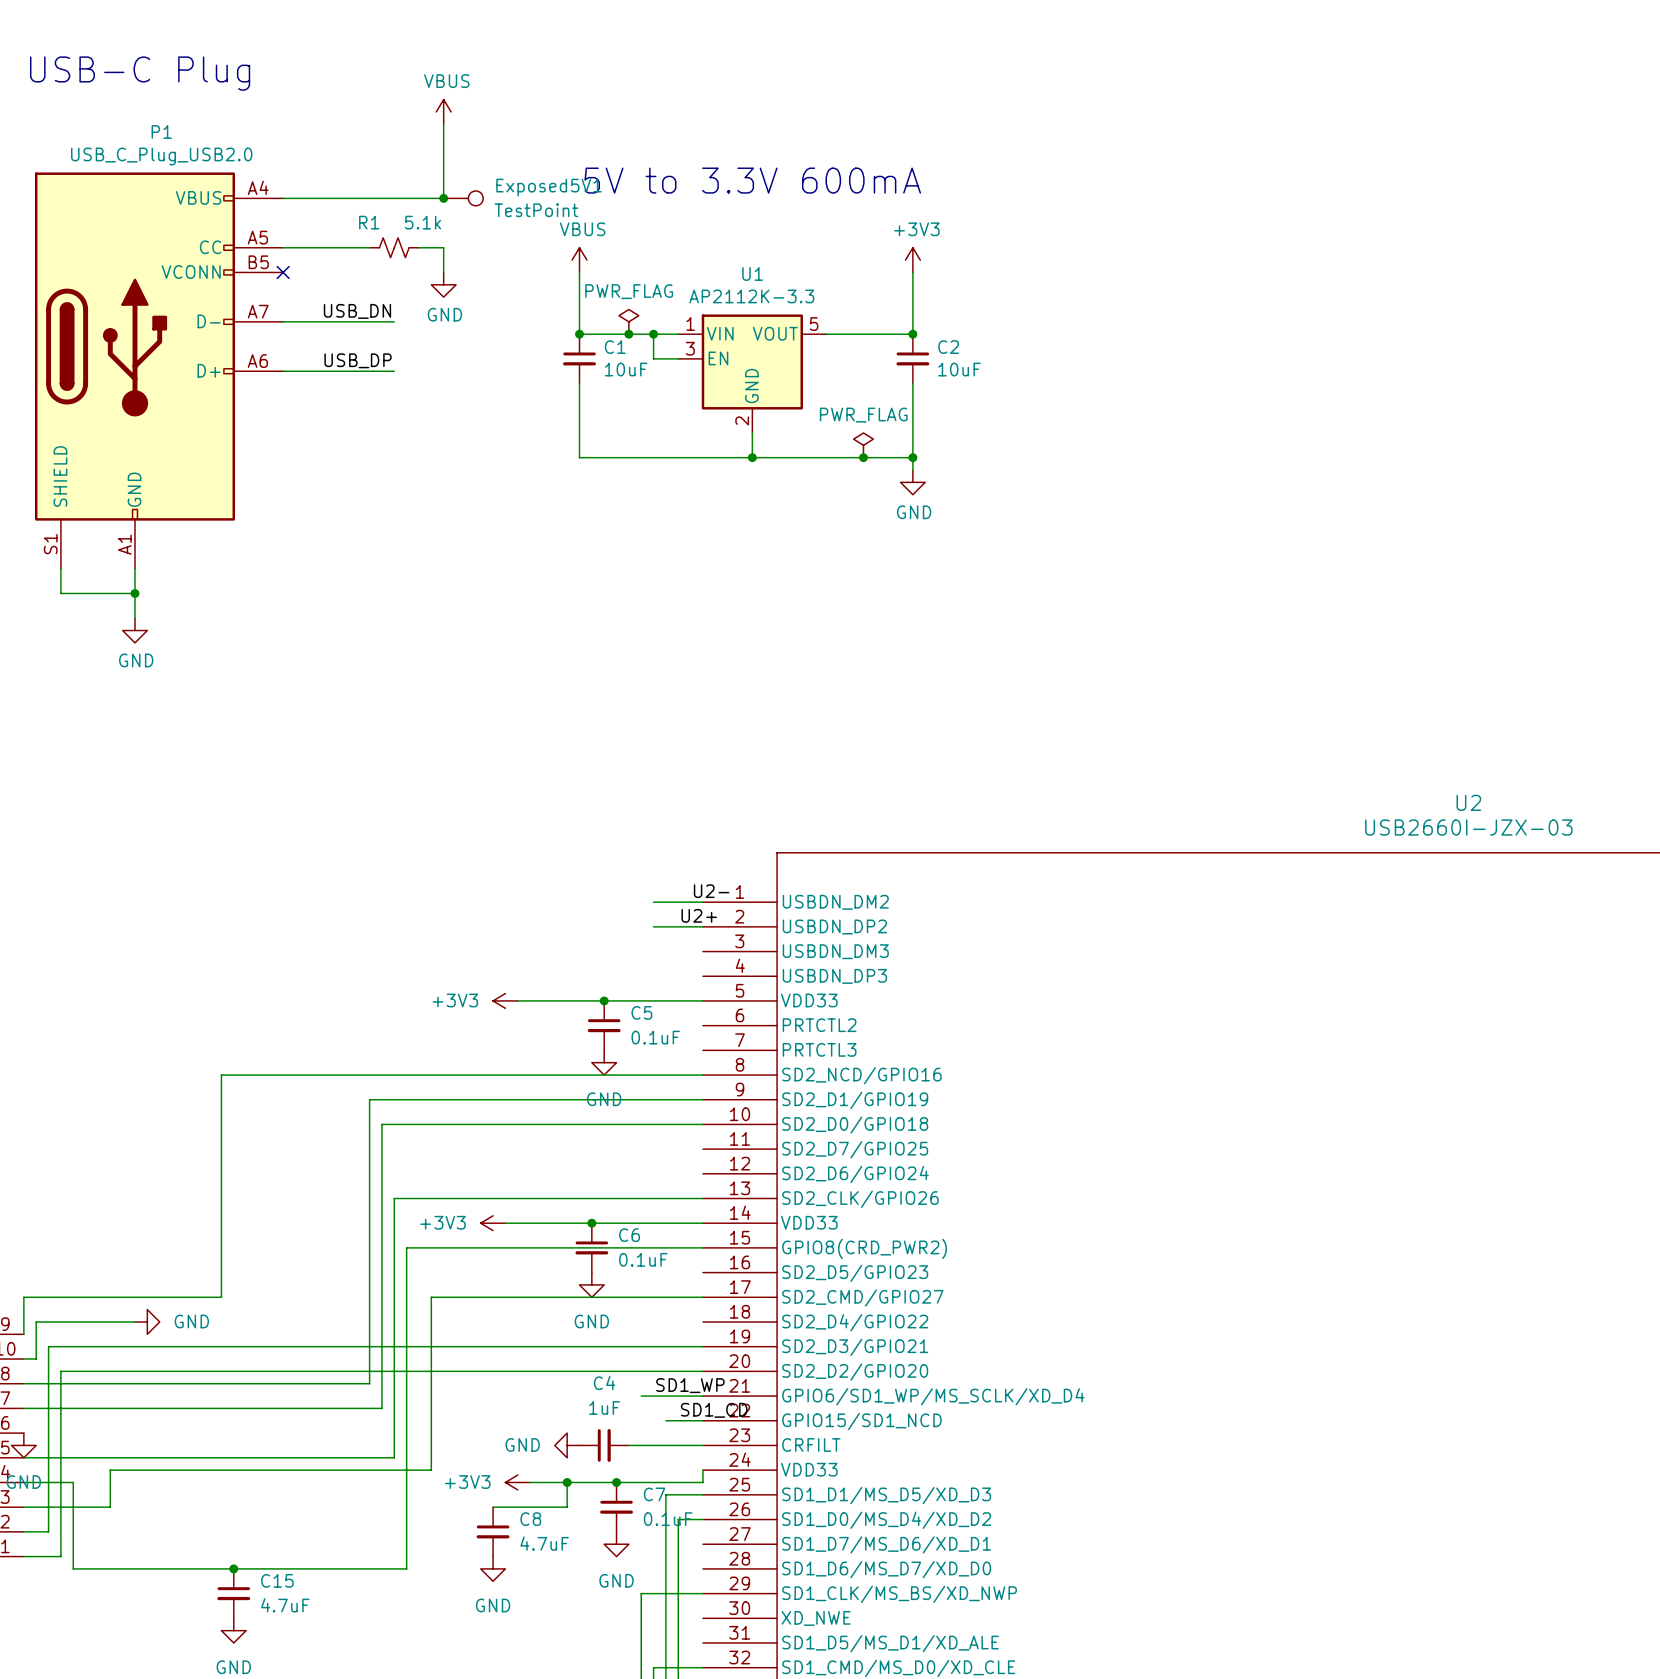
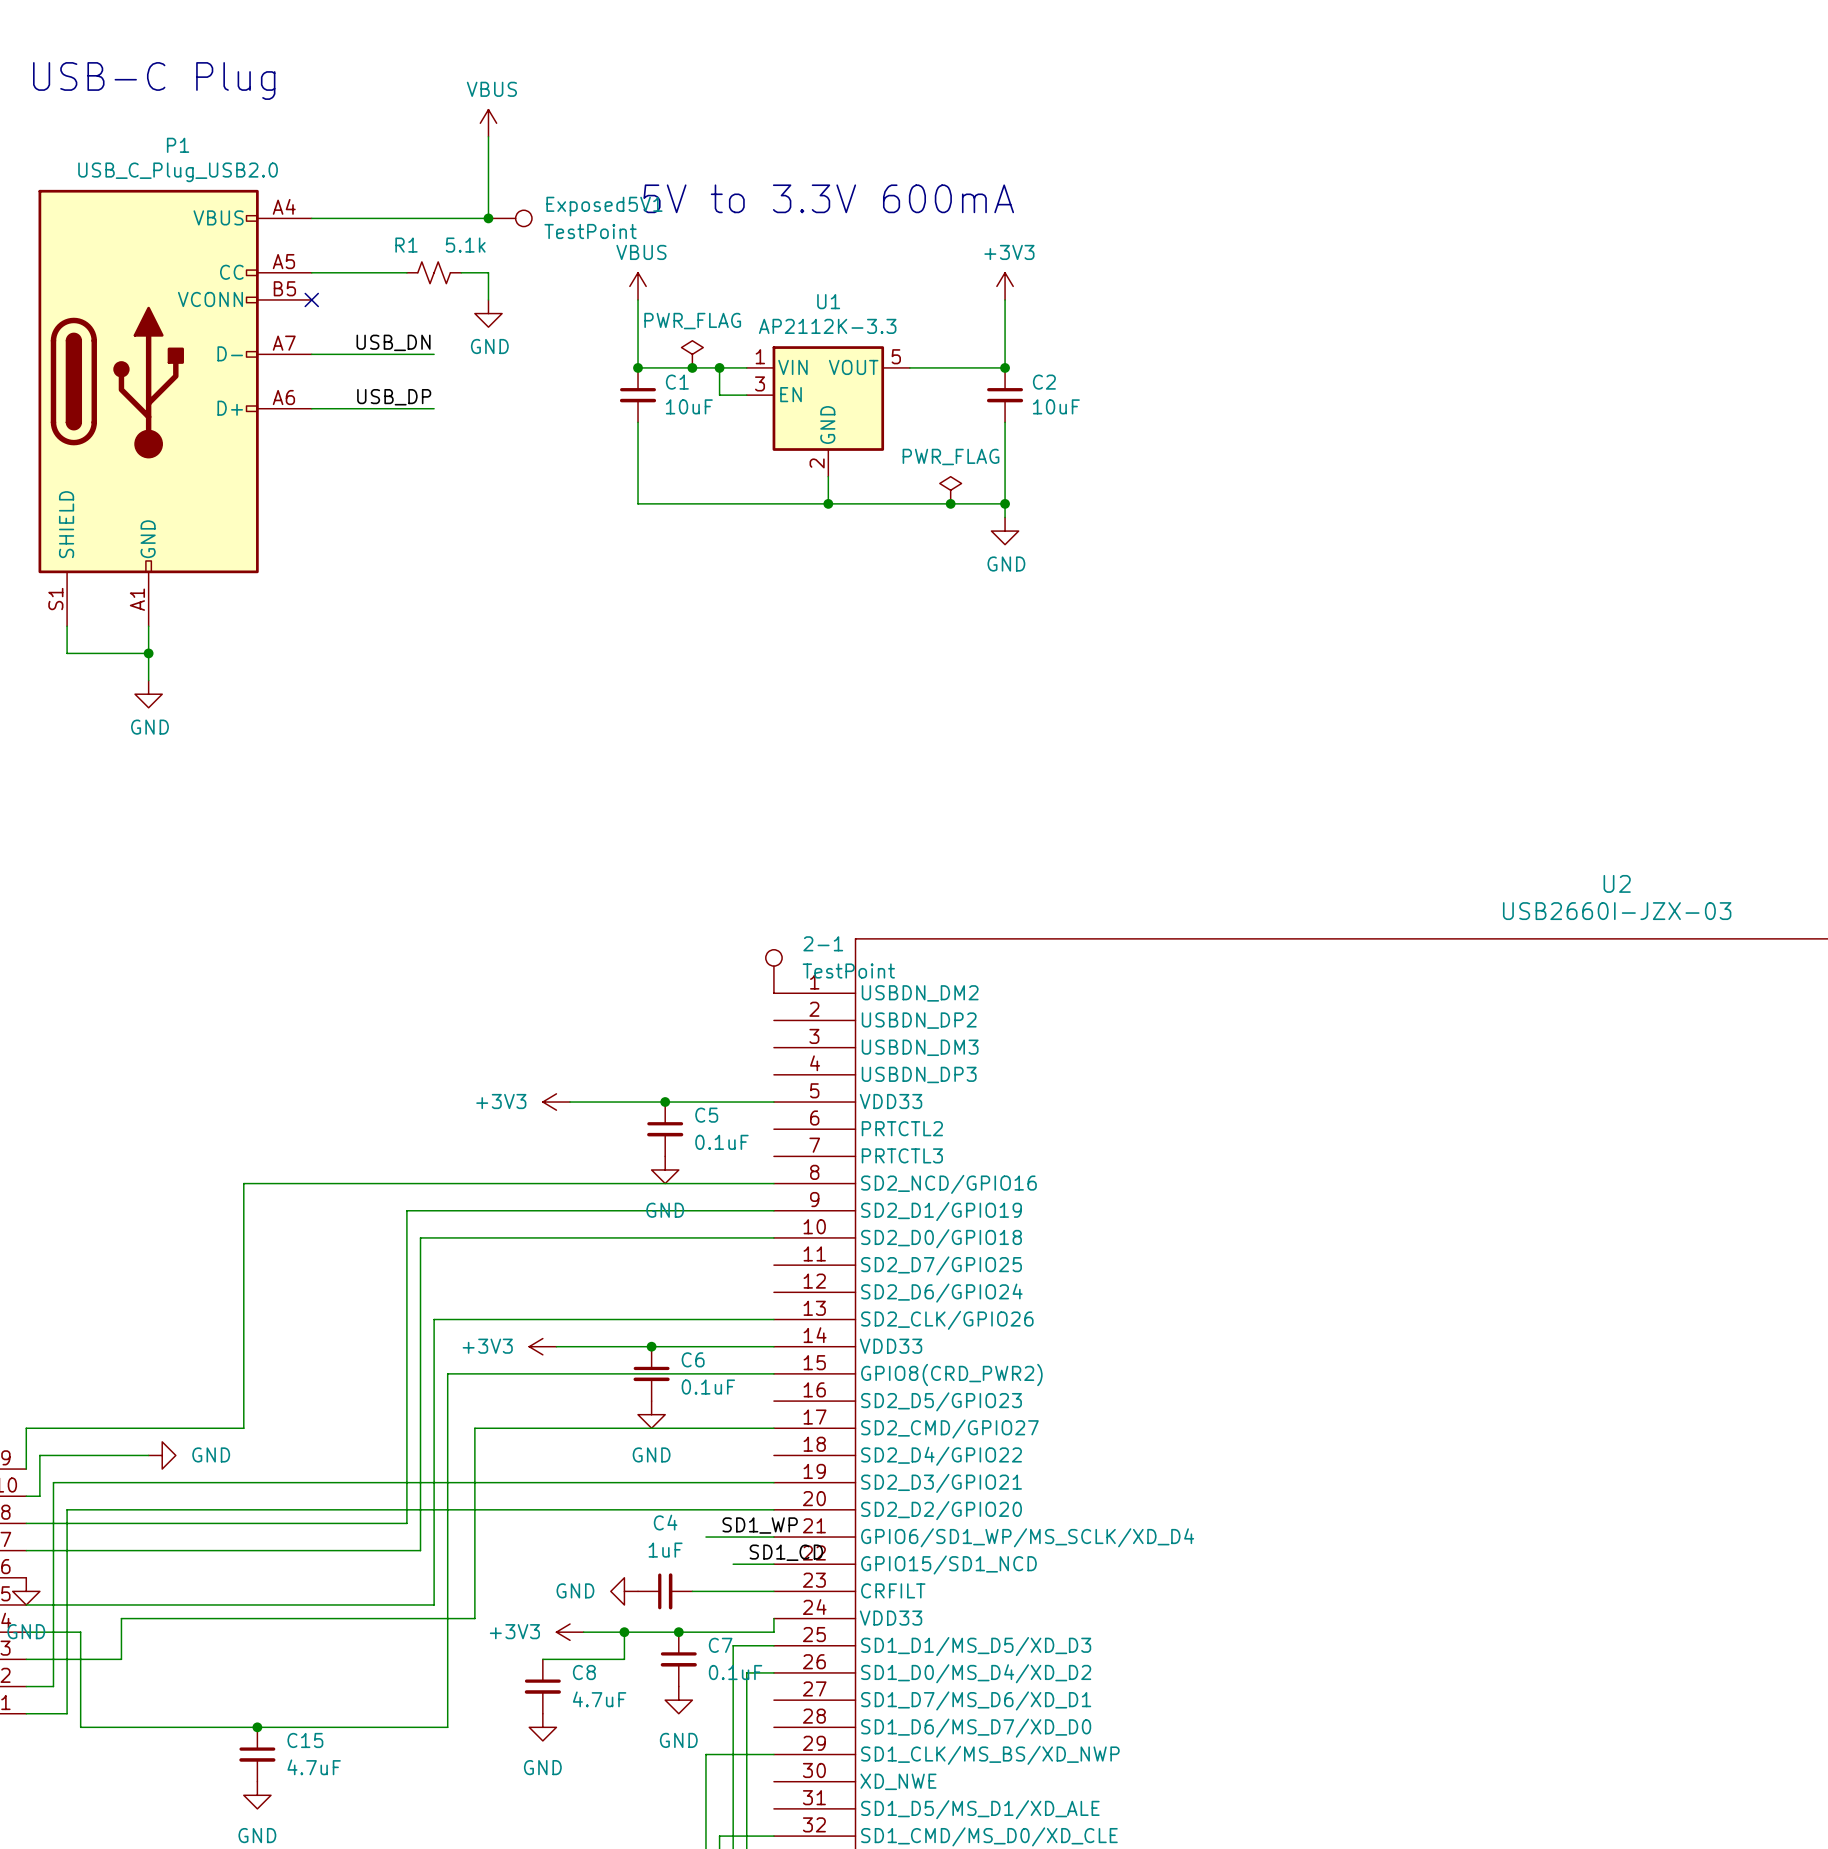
2-1: none -> TestPoint (773, 971)
label: U2- (711, 891) -> none
wire: (653, 902) (702, 902) -> none
label: U2+ (699, 915) -> none
wire: (653, 926) (702, 926) -> none

